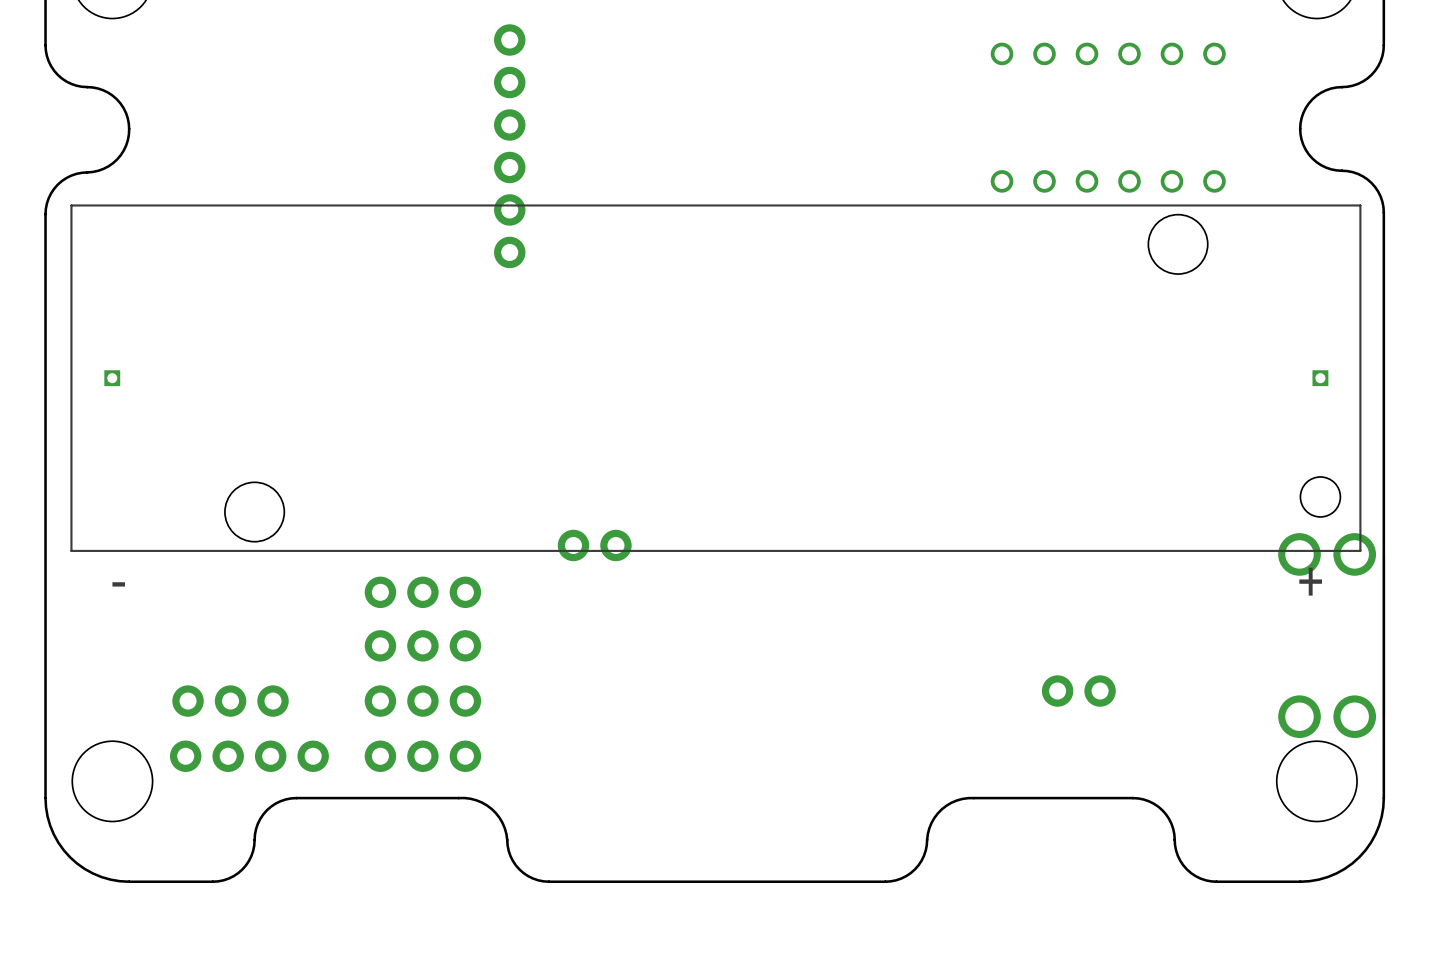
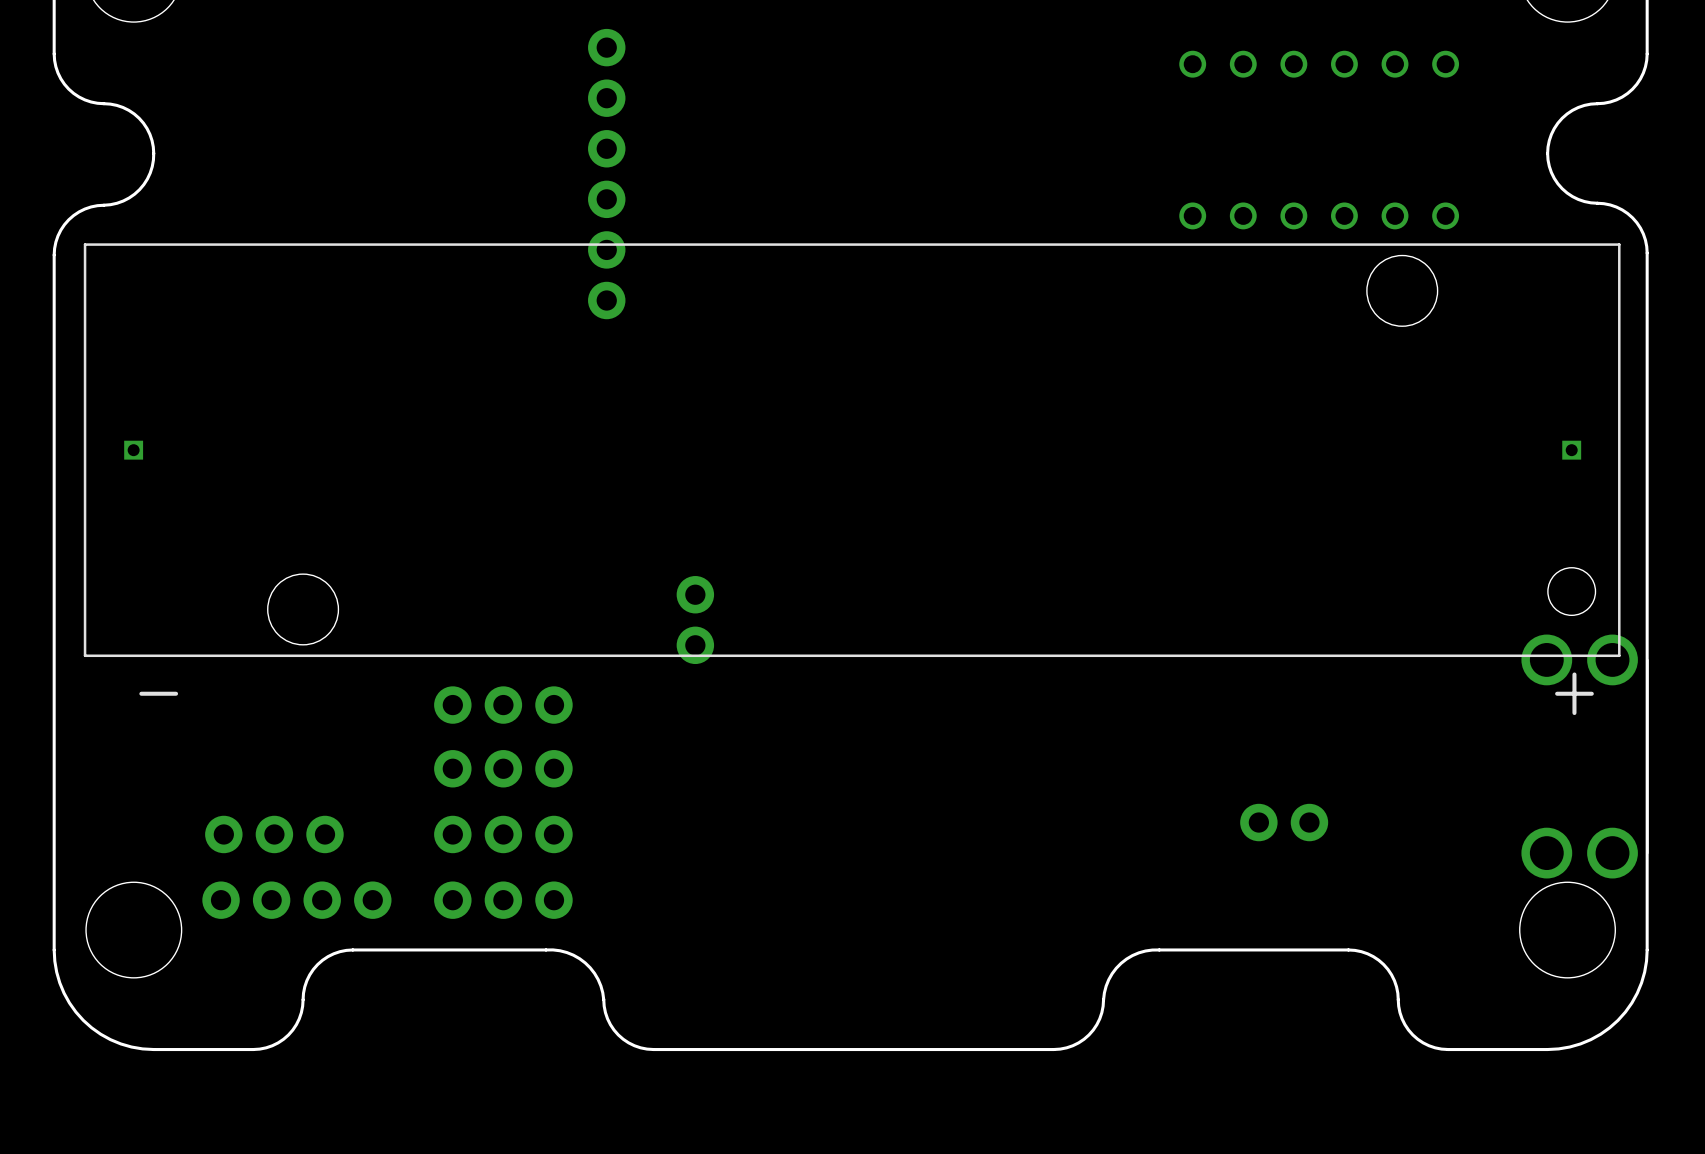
part rotation: 0° (594, 545) -> 90° clockwise (695, 620)

